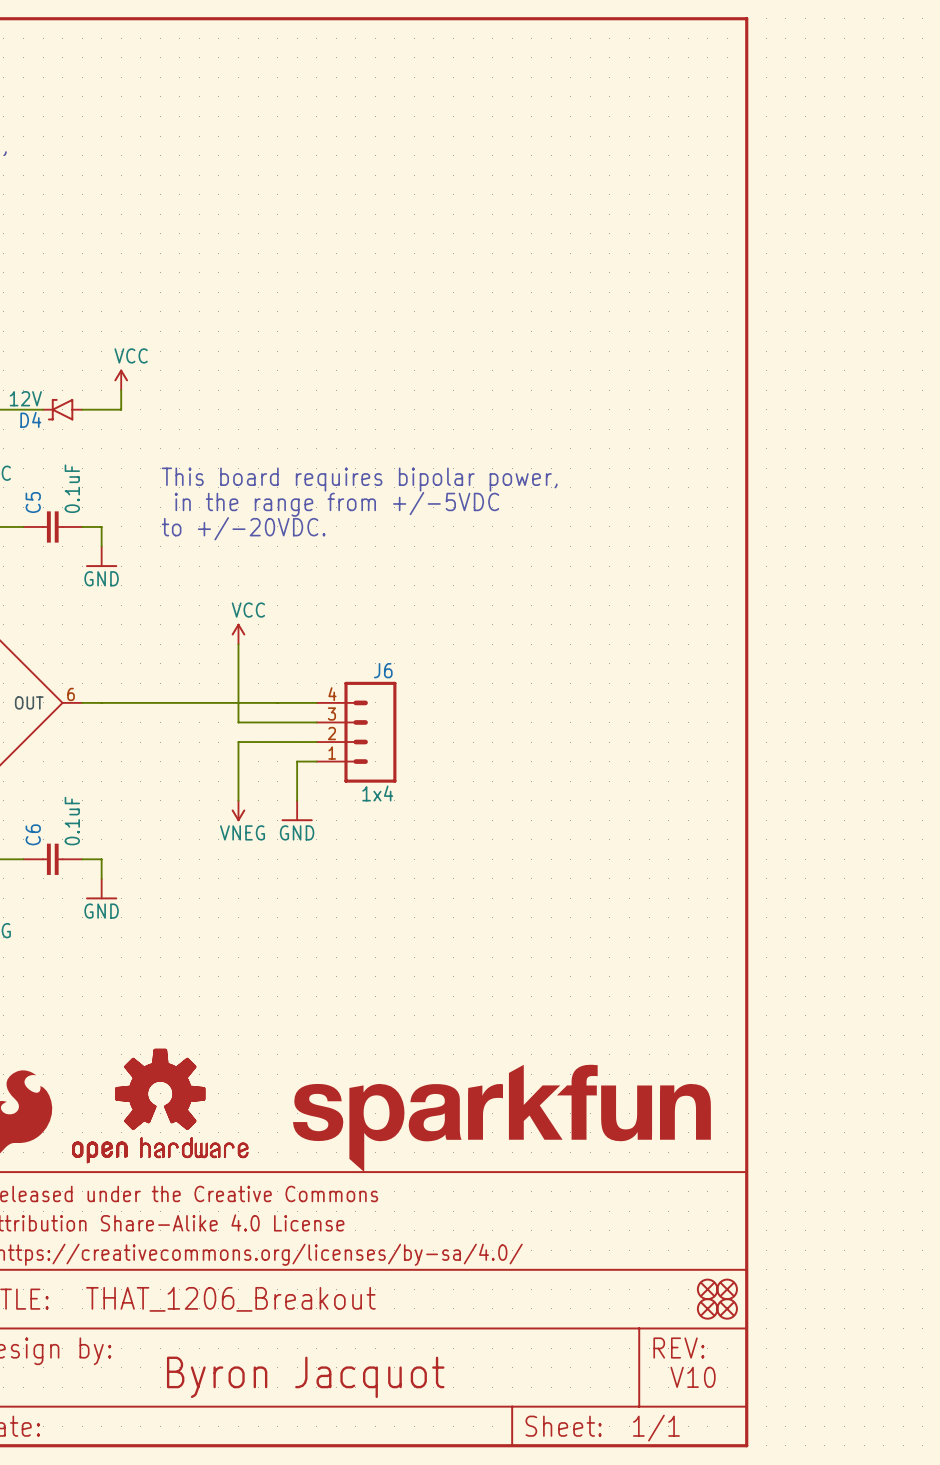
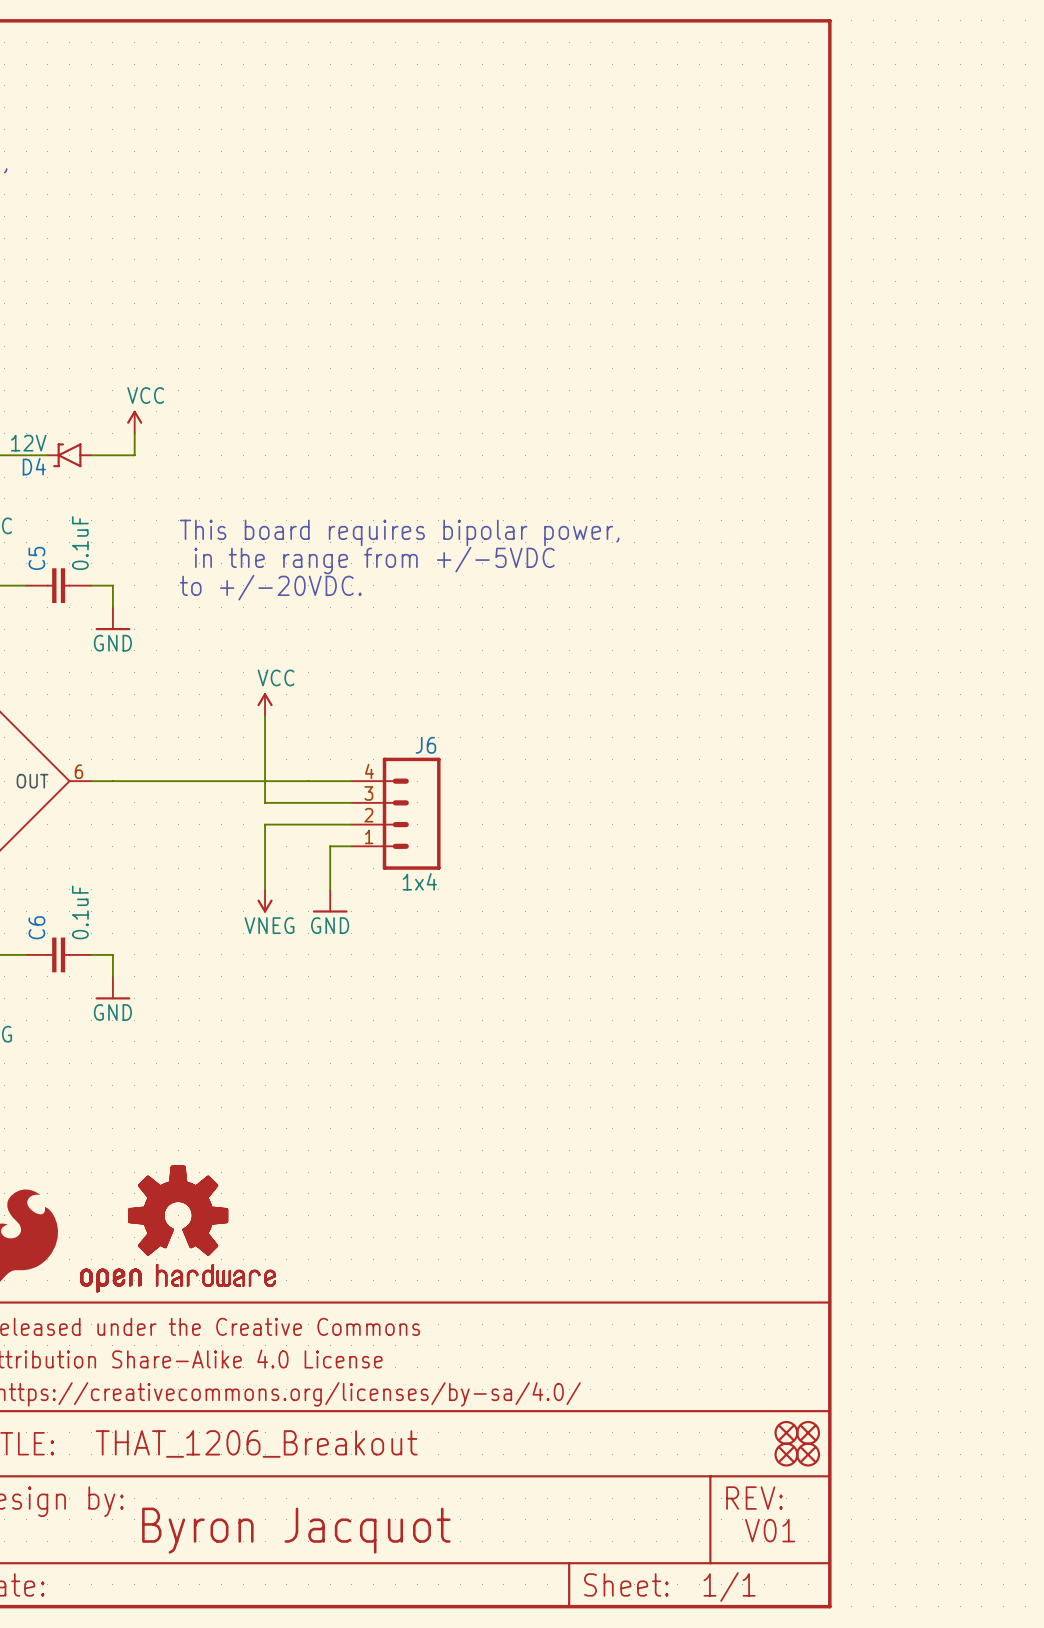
part: (501, 1118) -> none
text position: Byron Jacquot (305, 1377) -> Byron Jacquot (296, 1530)
text: V10 (693, 1377) -> V01 (770, 1530)

